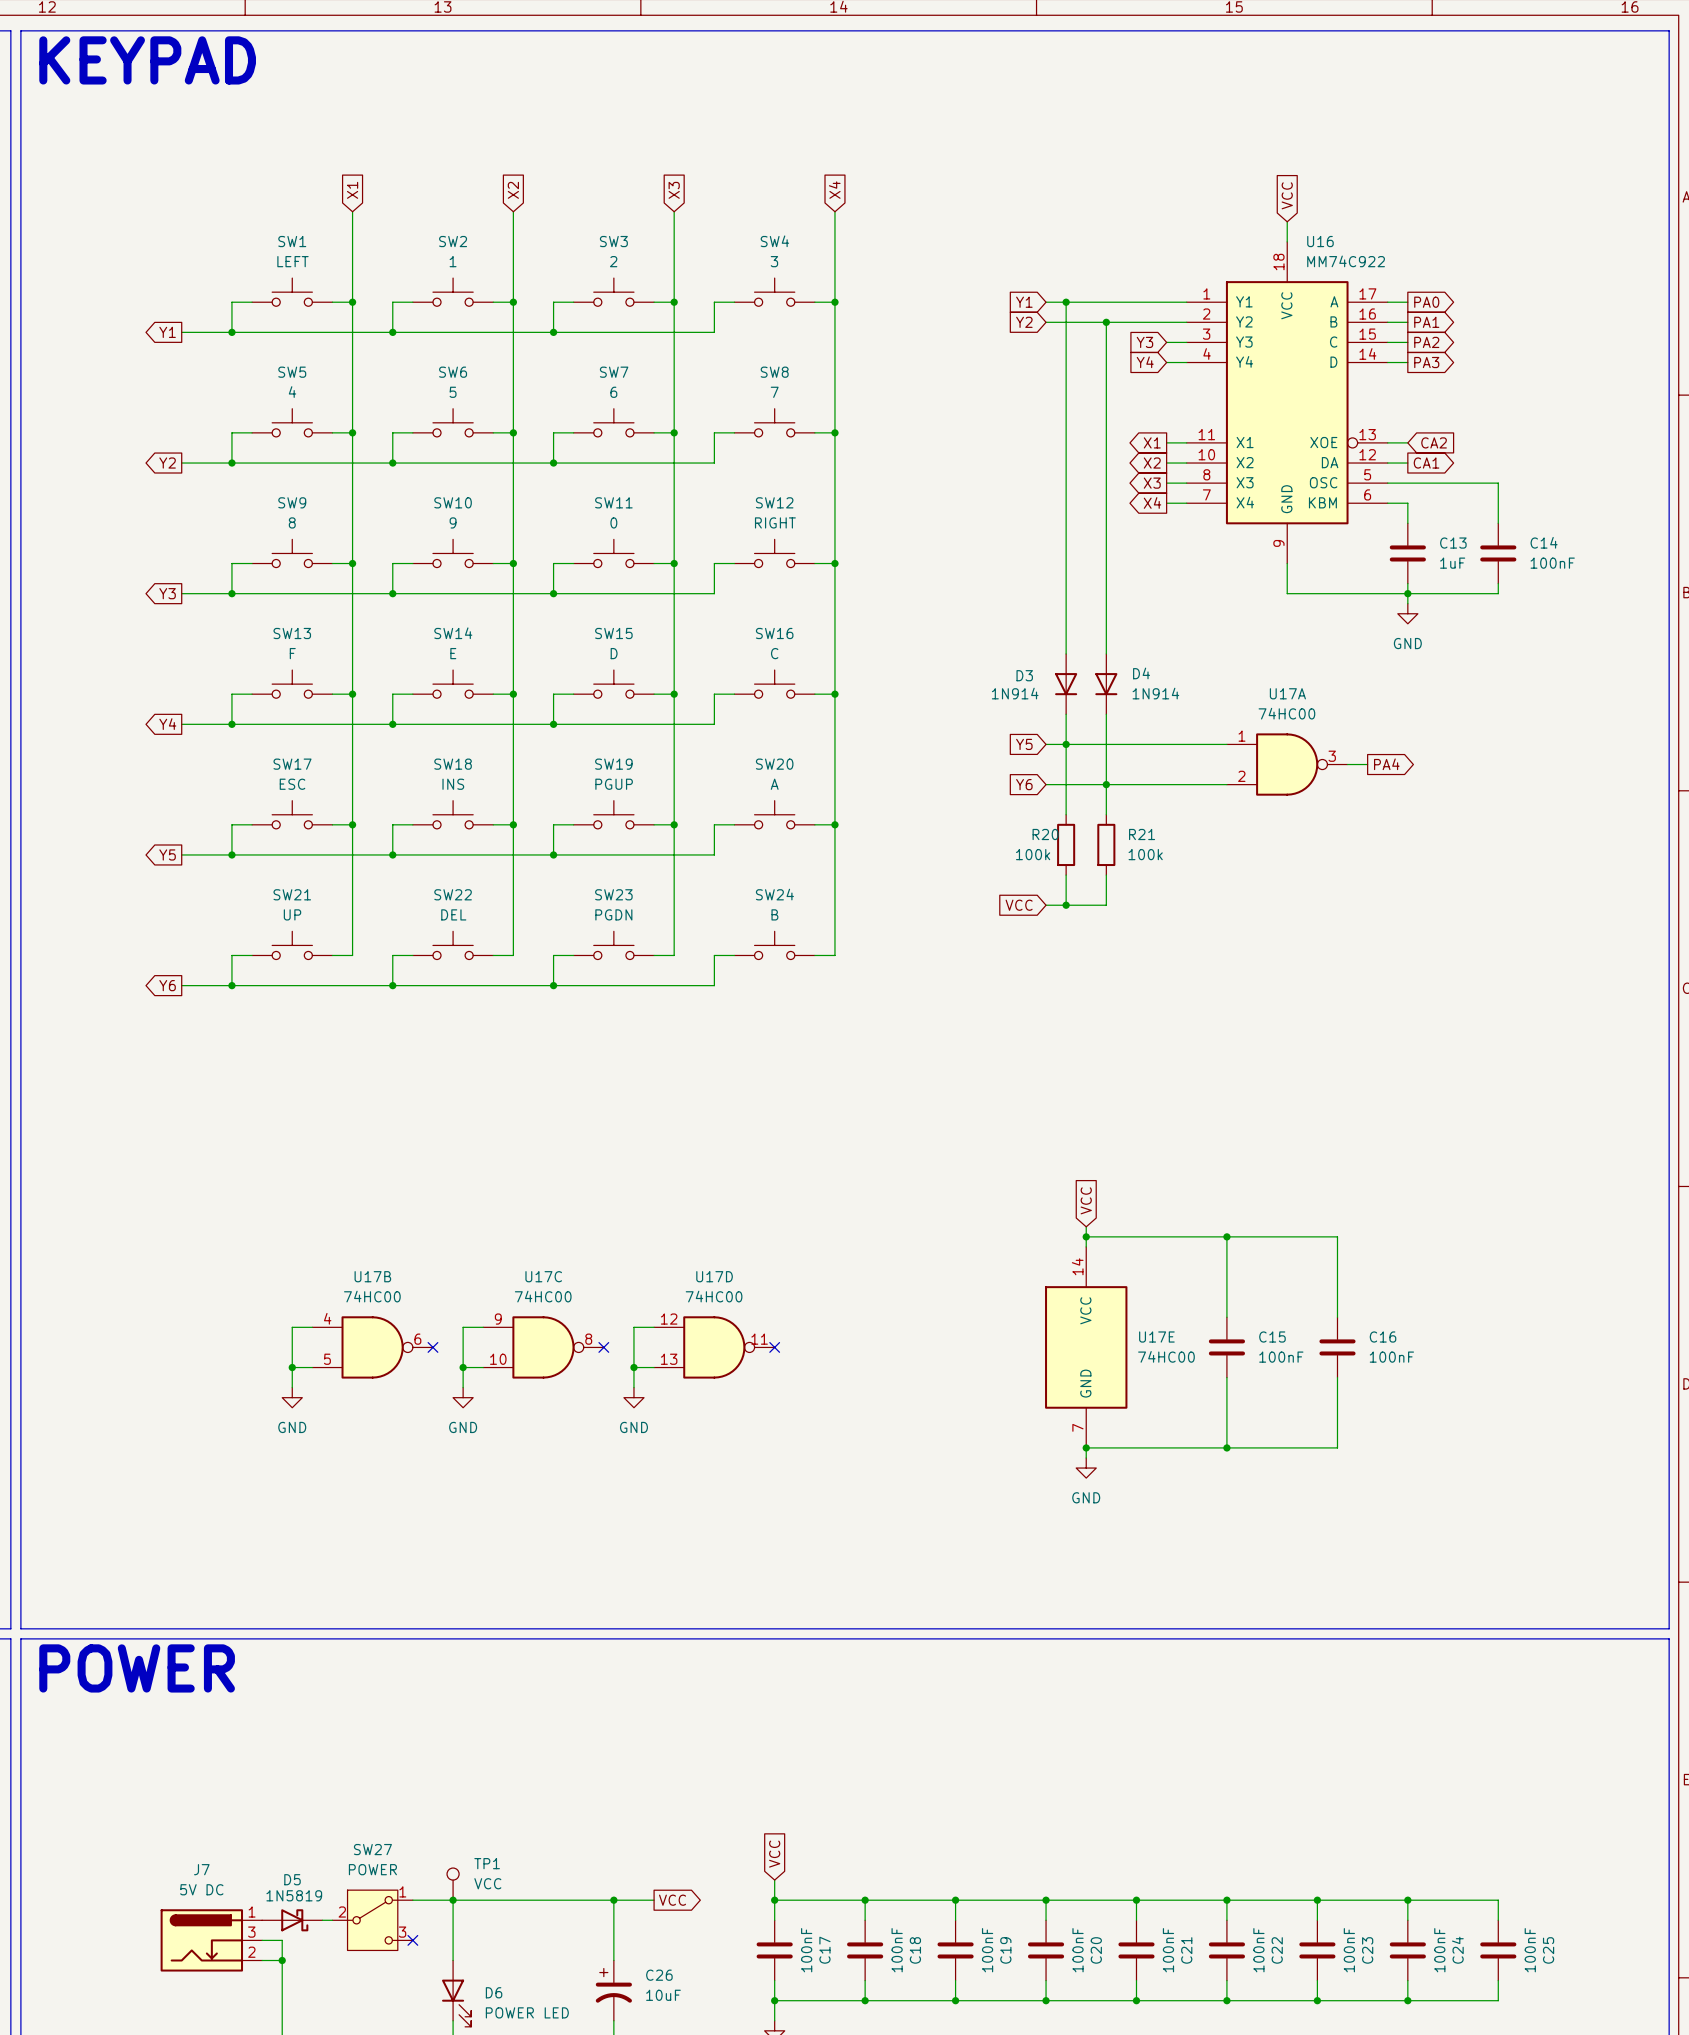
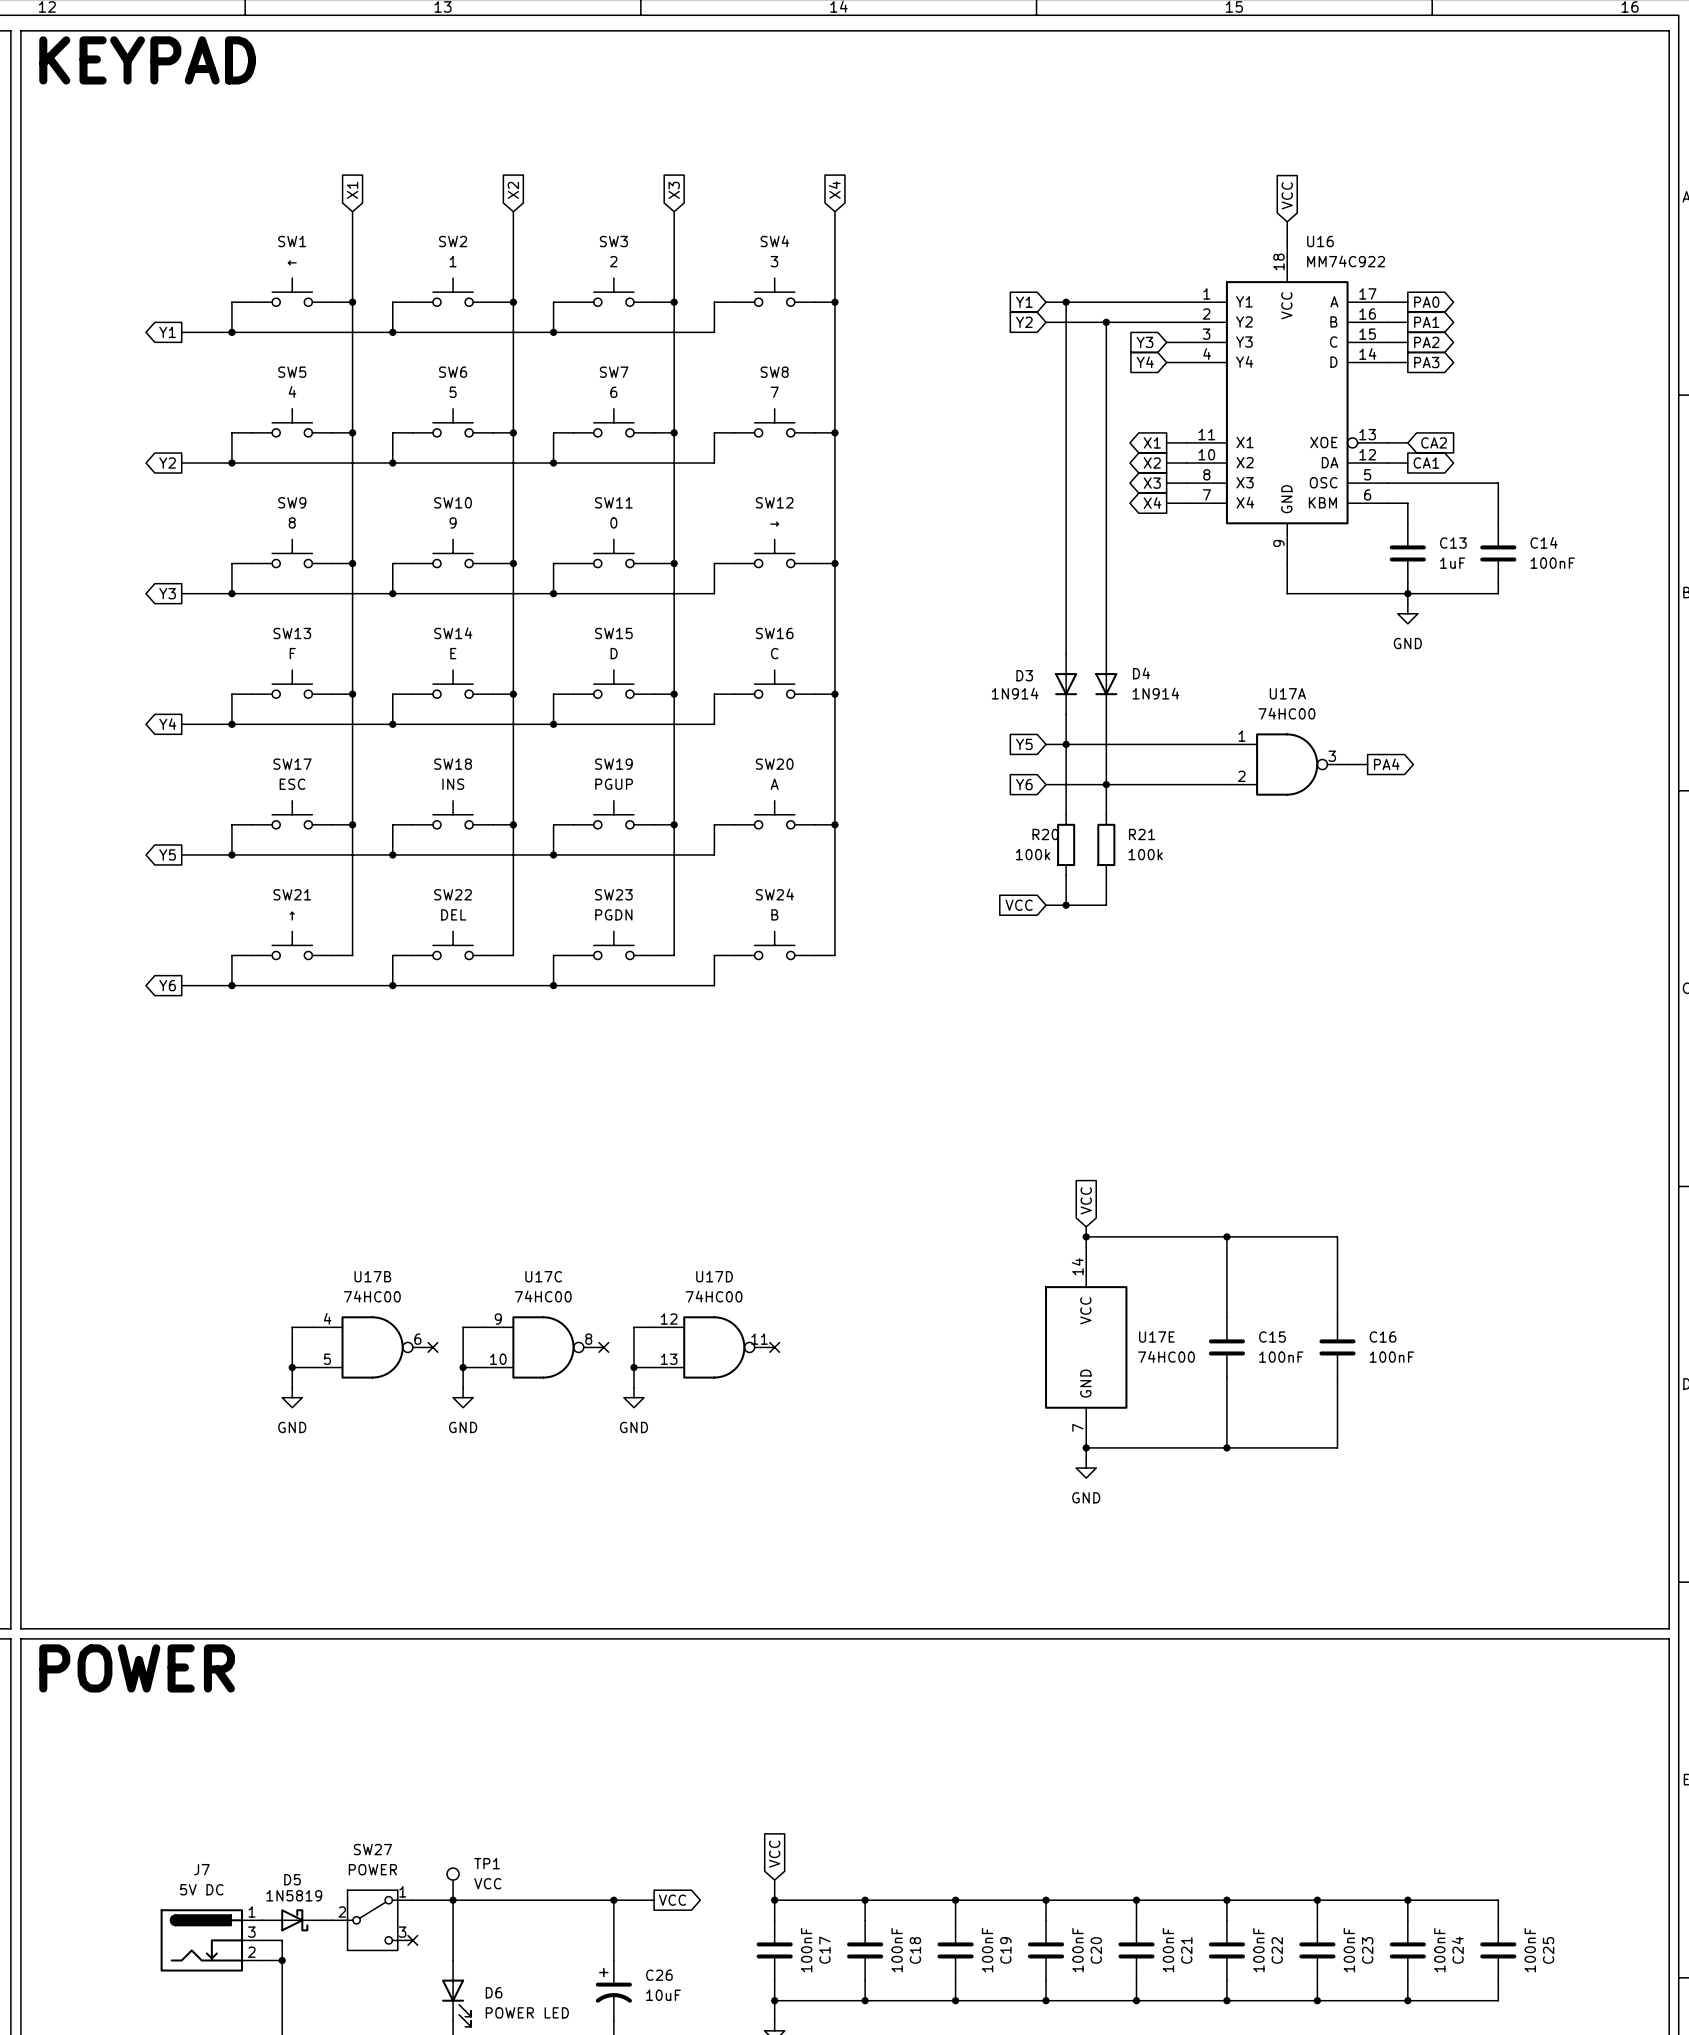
SW1 value: LEFT (292, 261) -> ← (292, 262)
SW12 value: RIGHT (775, 522) -> → (774, 524)
SW21 value: UP (292, 914) -> ↑ (292, 916)

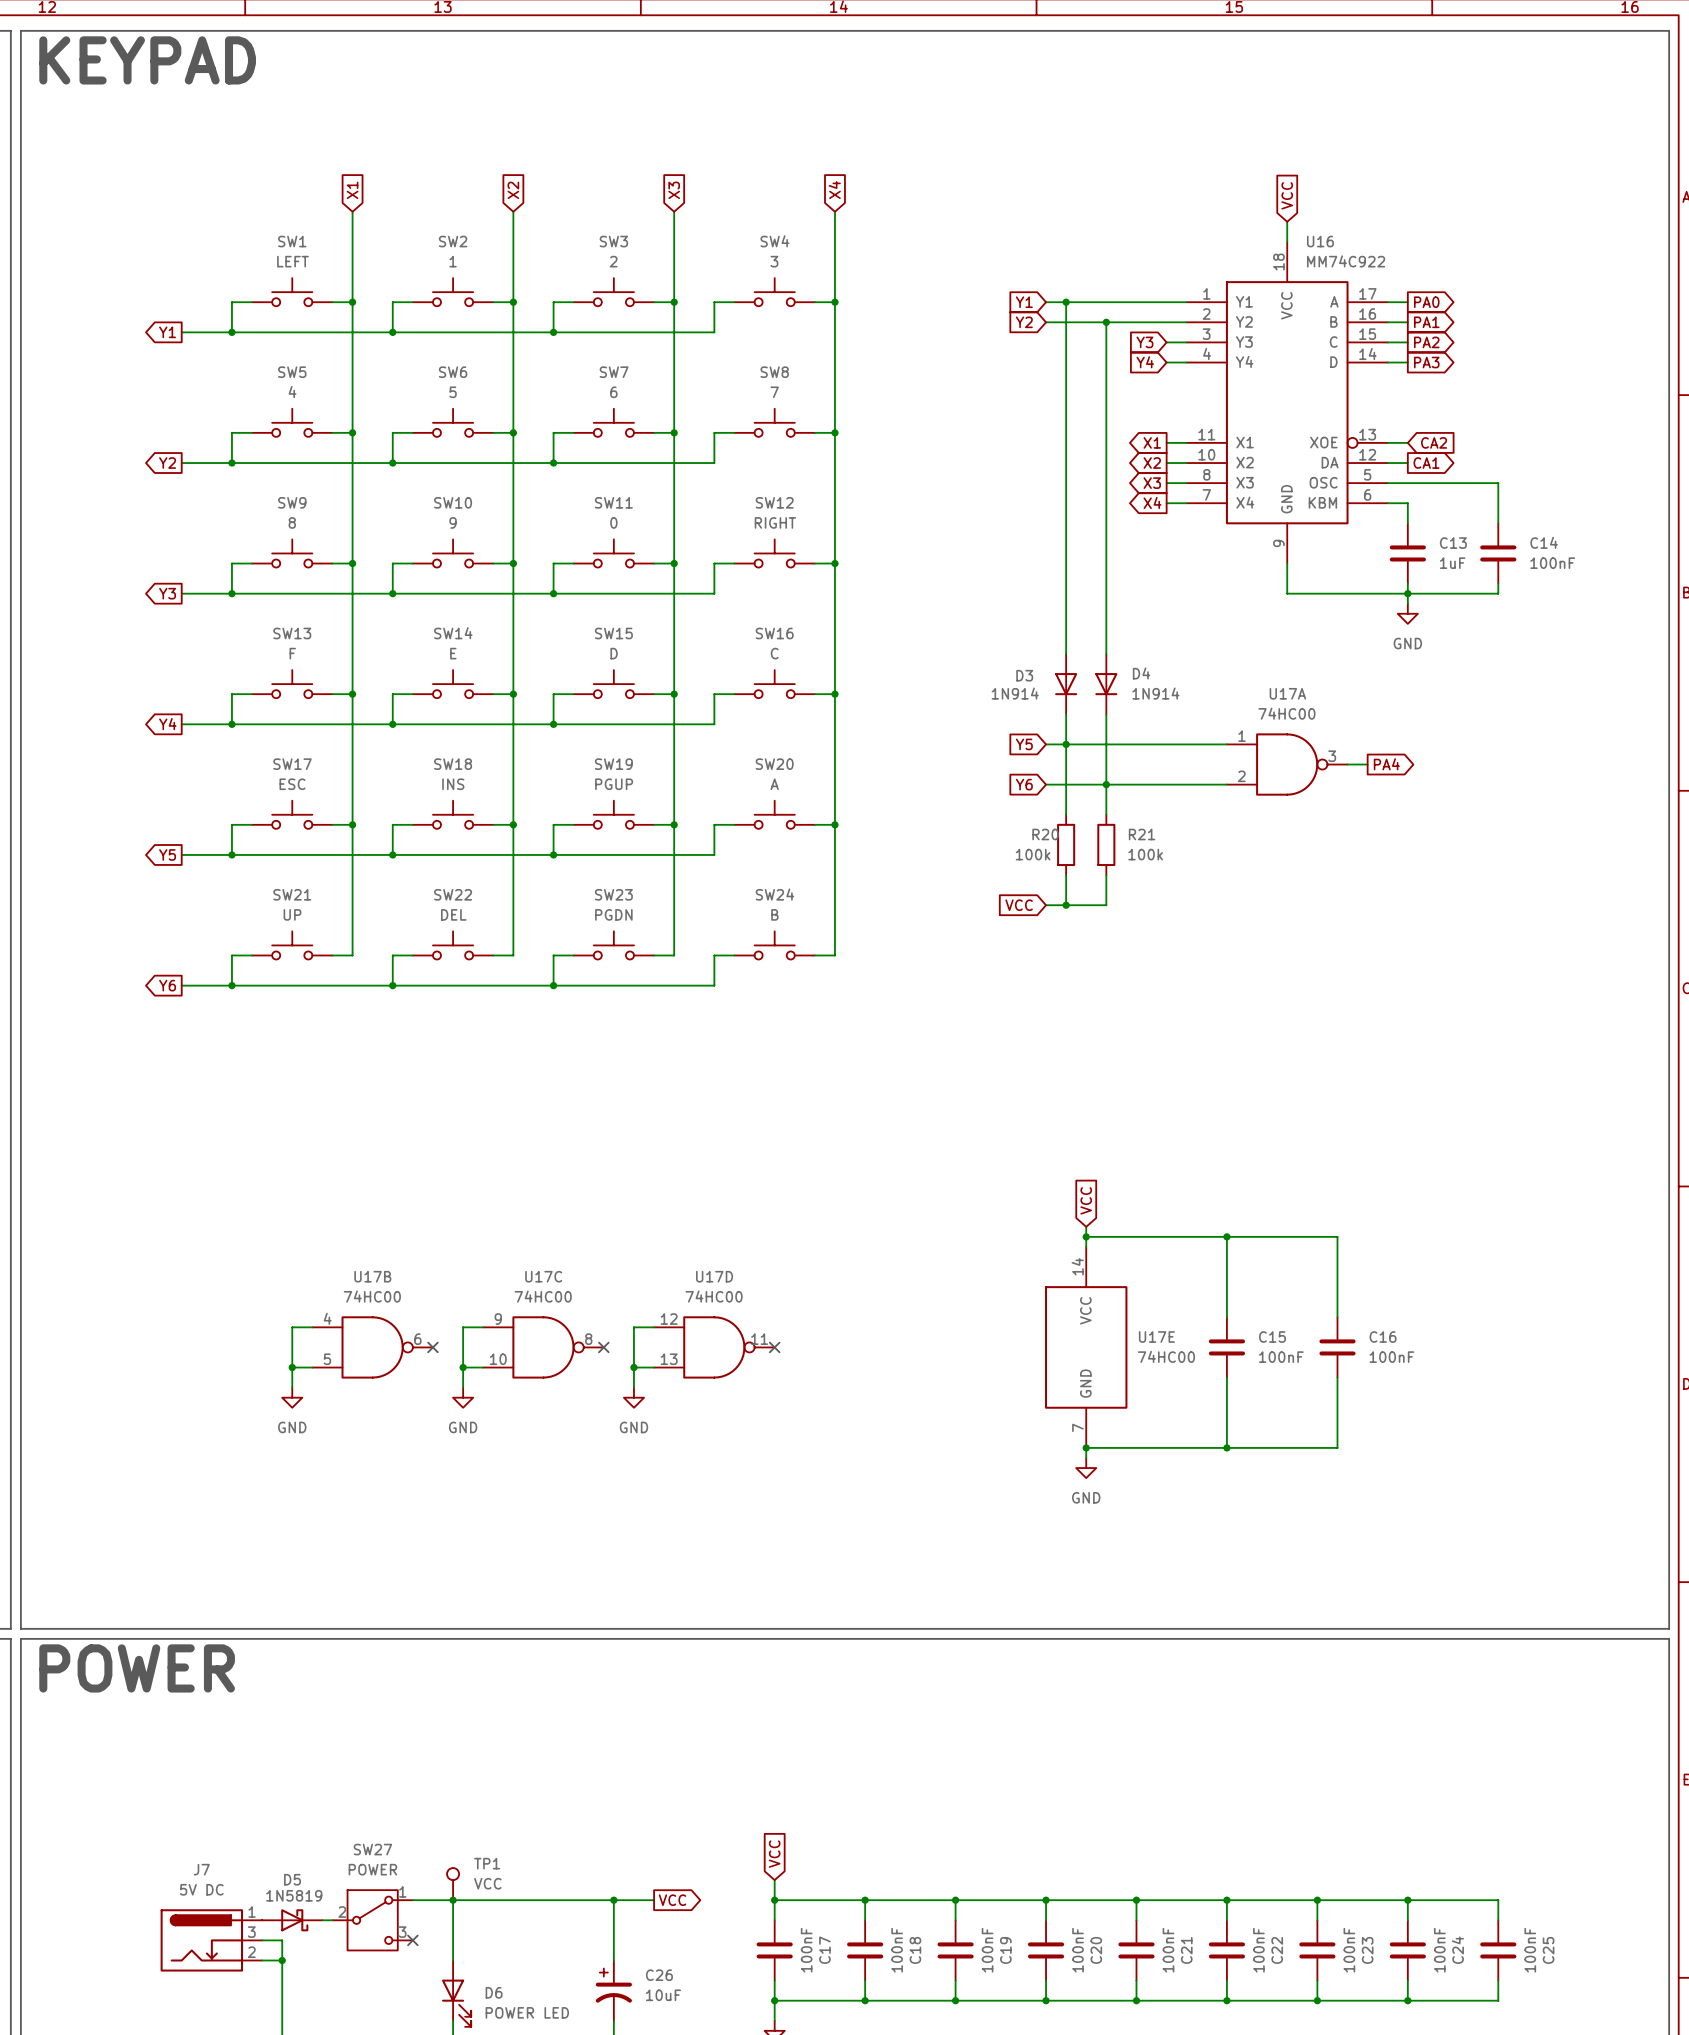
SW1 value: ← (292, 262) -> LEFT (292, 261)
SW12 value: → (774, 524) -> RIGHT (775, 522)
SW21 value: ↑ (292, 916) -> UP (292, 914)

